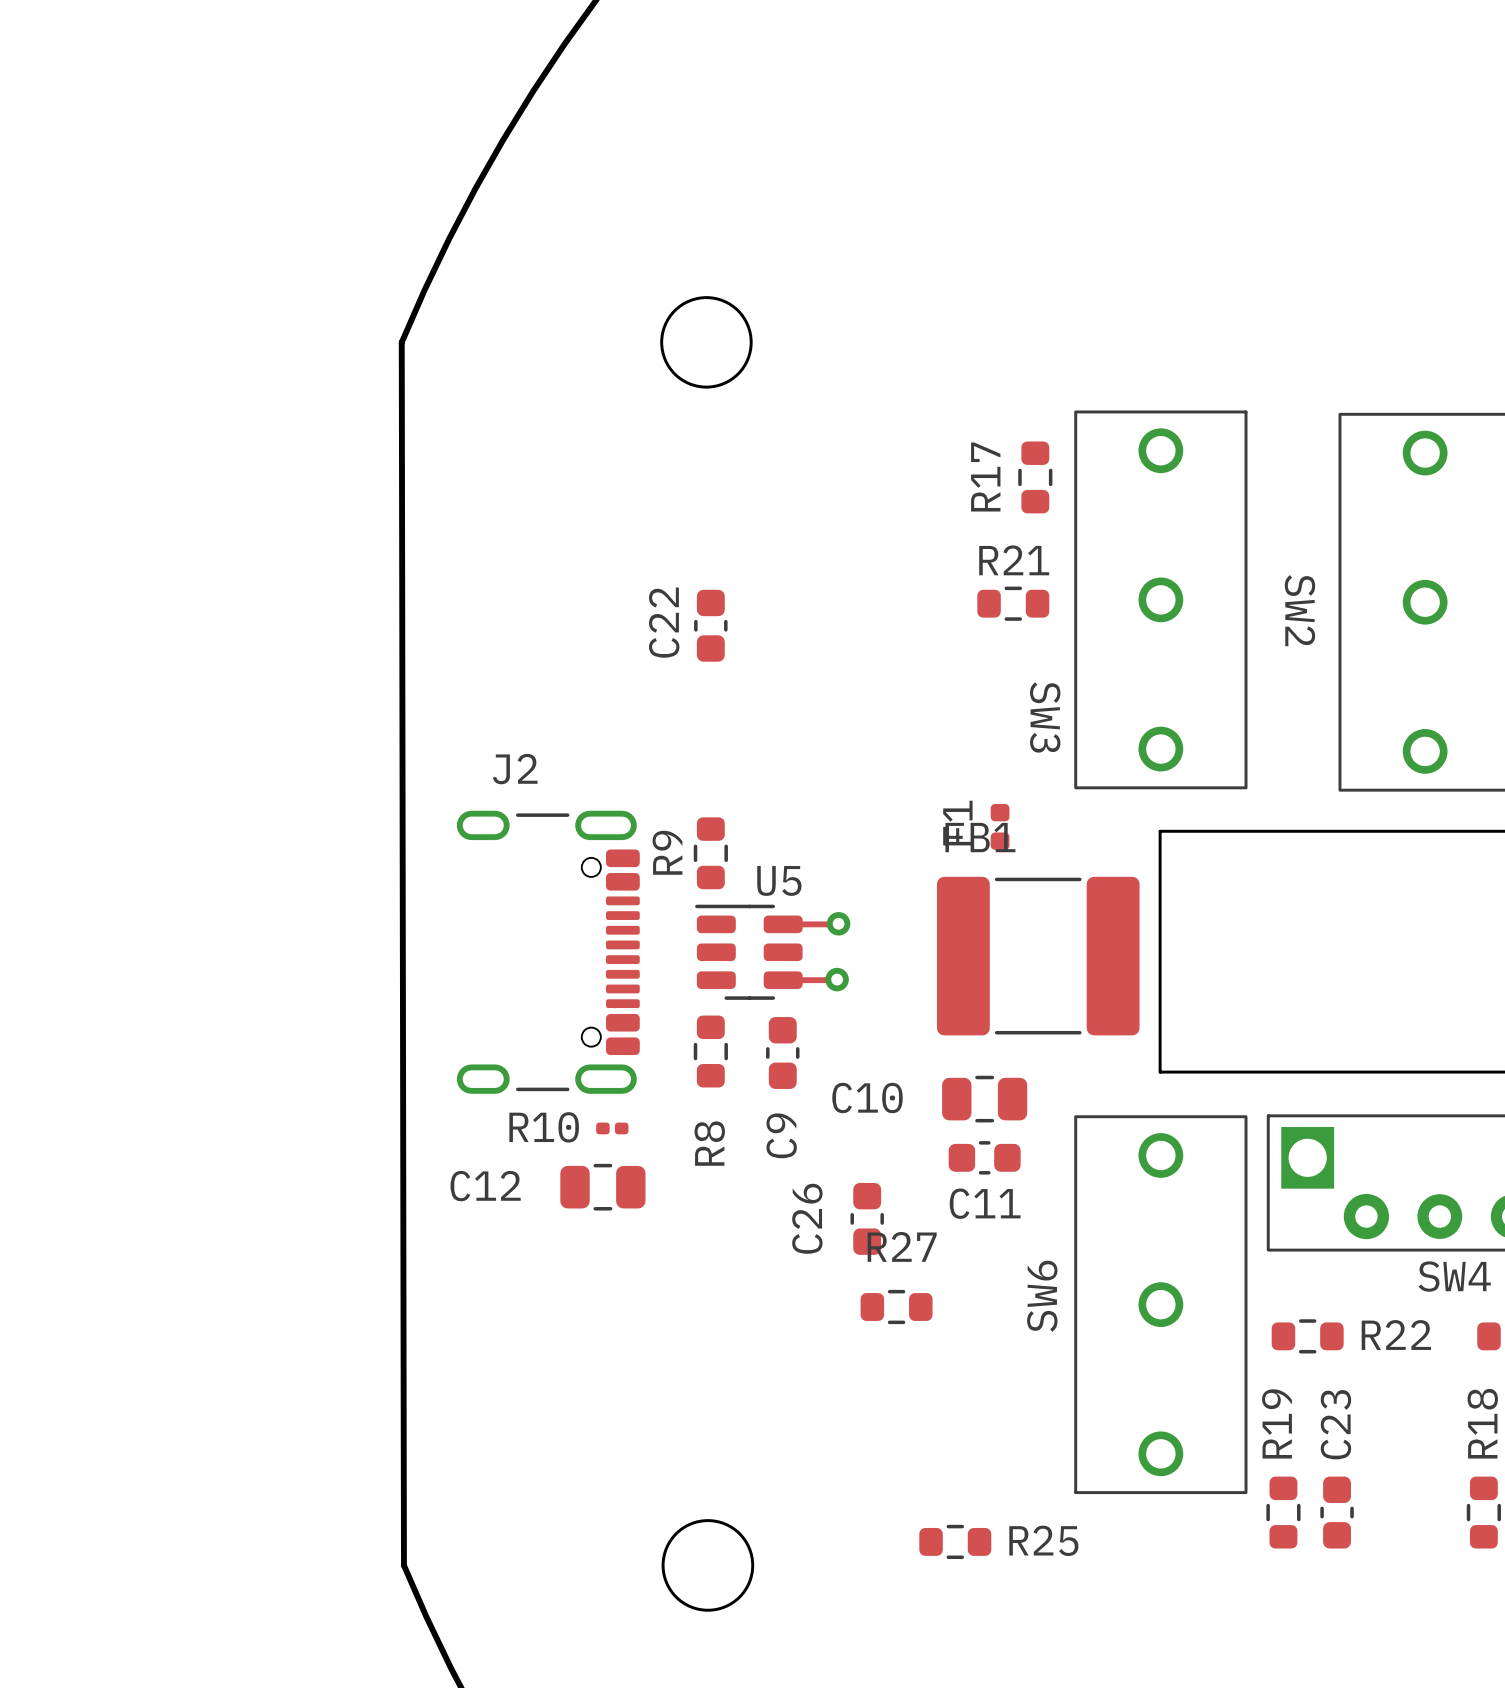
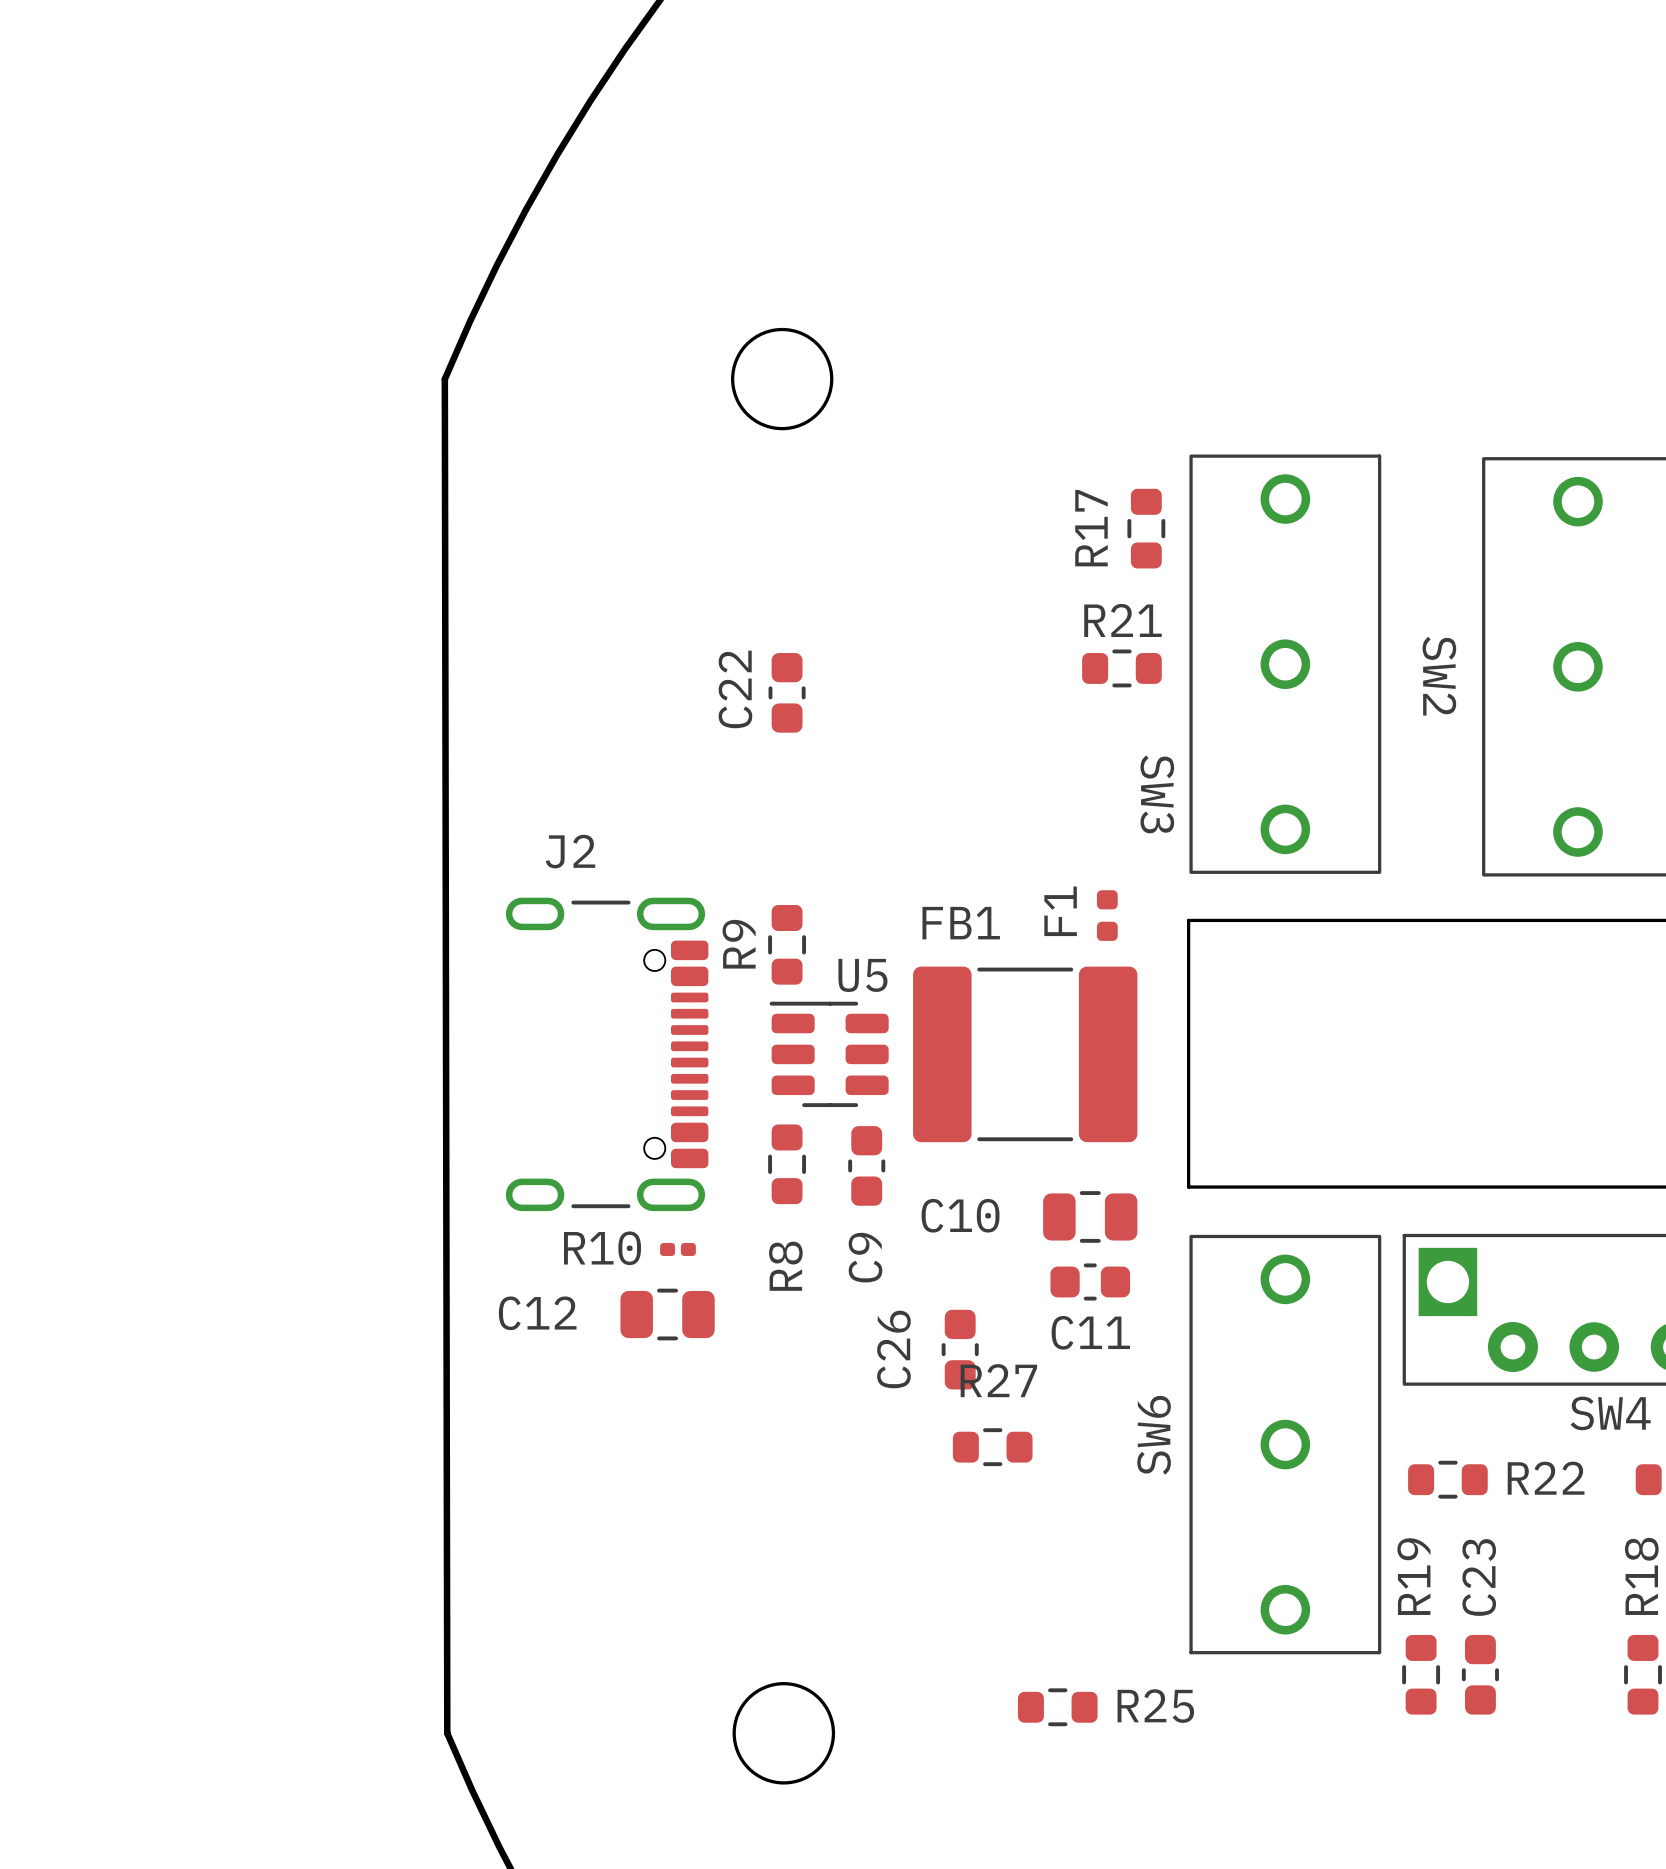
board edge: (1160, 831) (1160, 1072) -> (1284, 920) (1188, 920) (1188, 1187) (1284, 1187)
track: (838, 923) (783, 924) -> none
via: (838, 923) -> none
FB1 position: (1038, 956) -> (1025, 1054)
track: (837, 979) (783, 980) -> none
via: (837, 979) -> none

